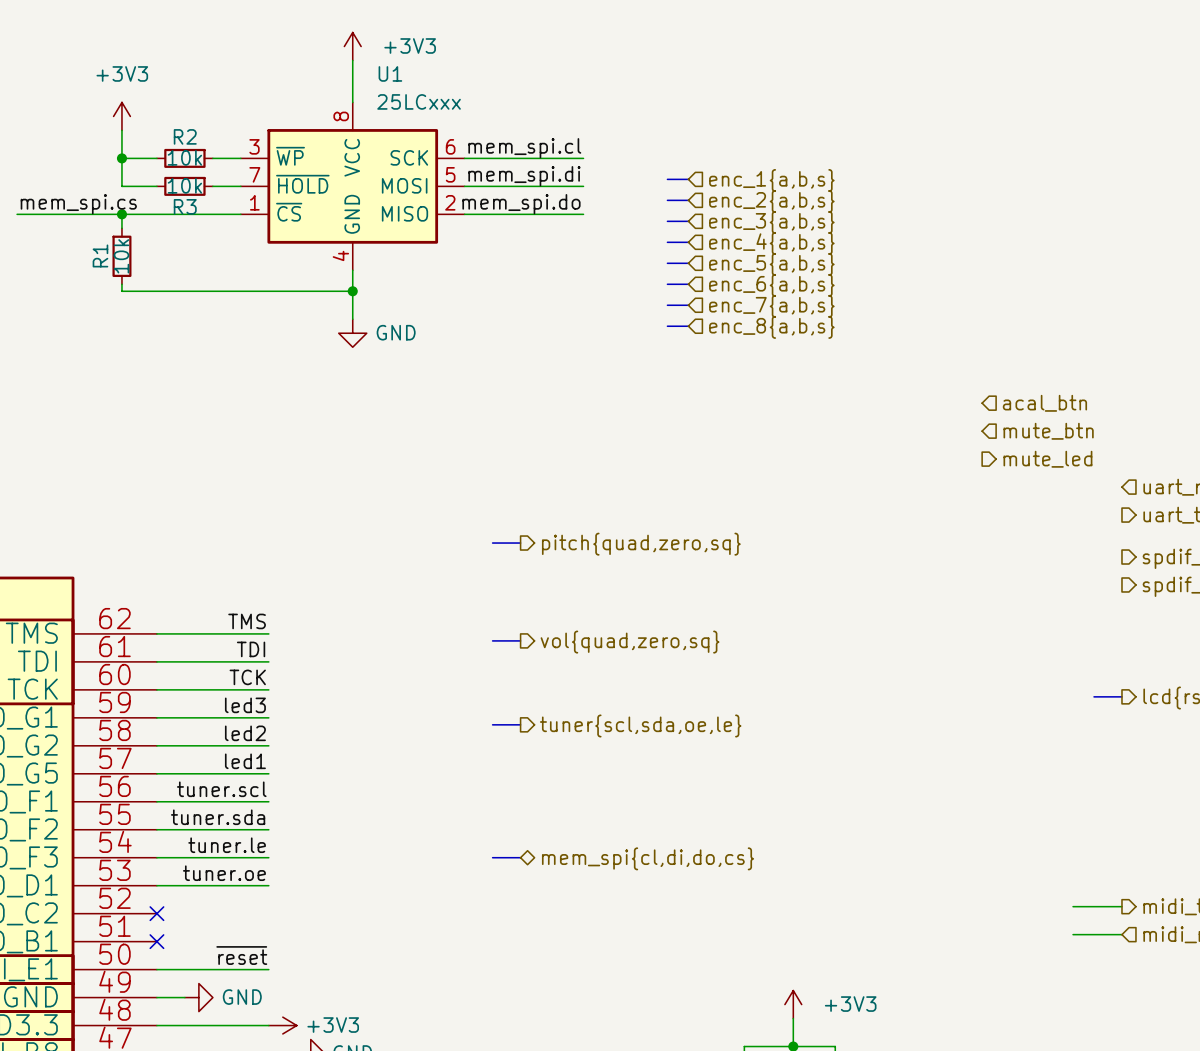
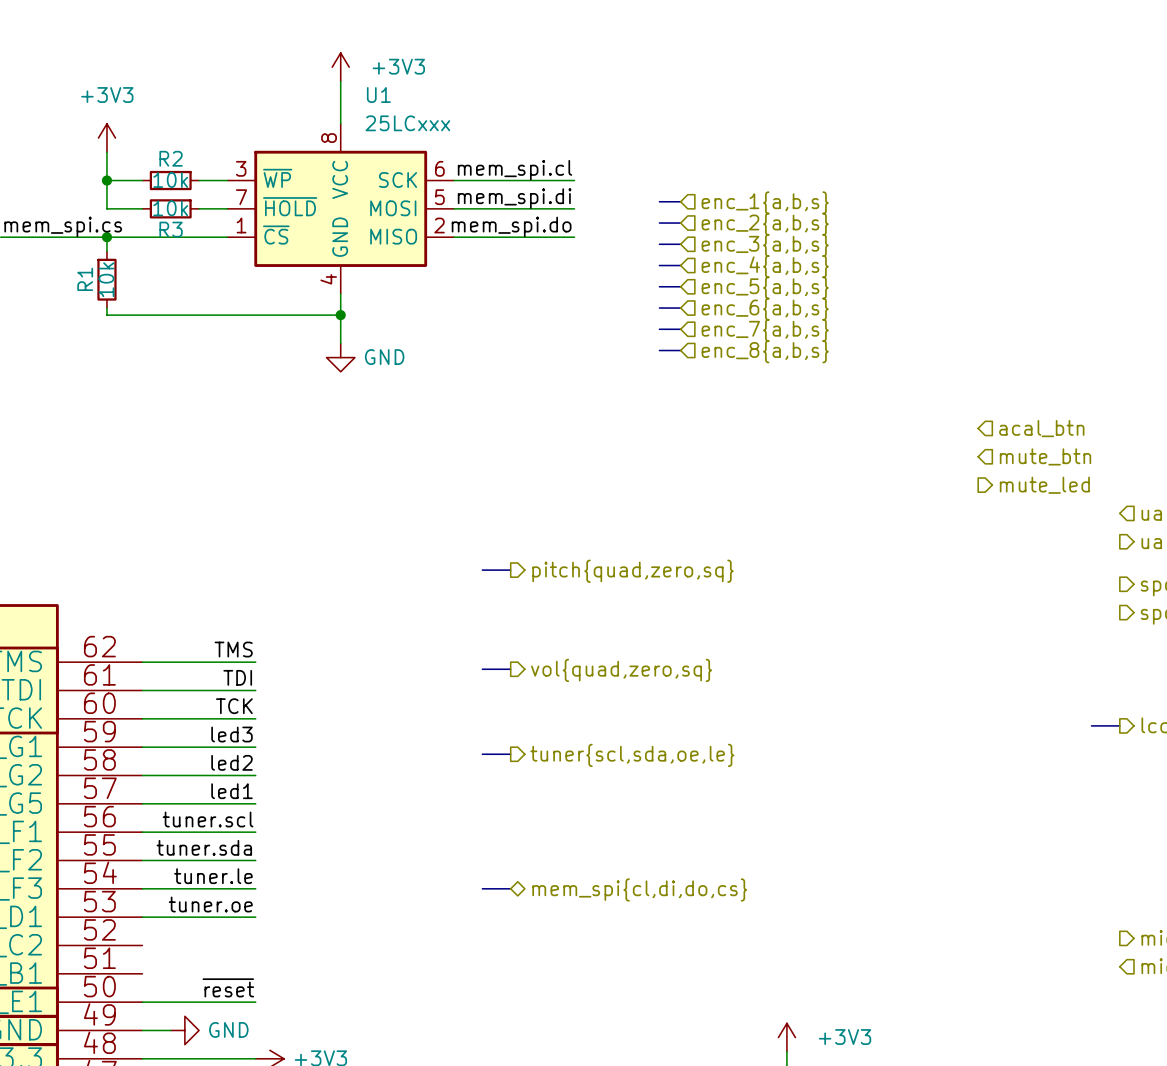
wire: (1073, 906) (1121, 906) -> none
no-connect mark: (156, 913) -> none
wire: (1073, 934) (1121, 934) -> none
no-connect mark: (156, 941) -> none

